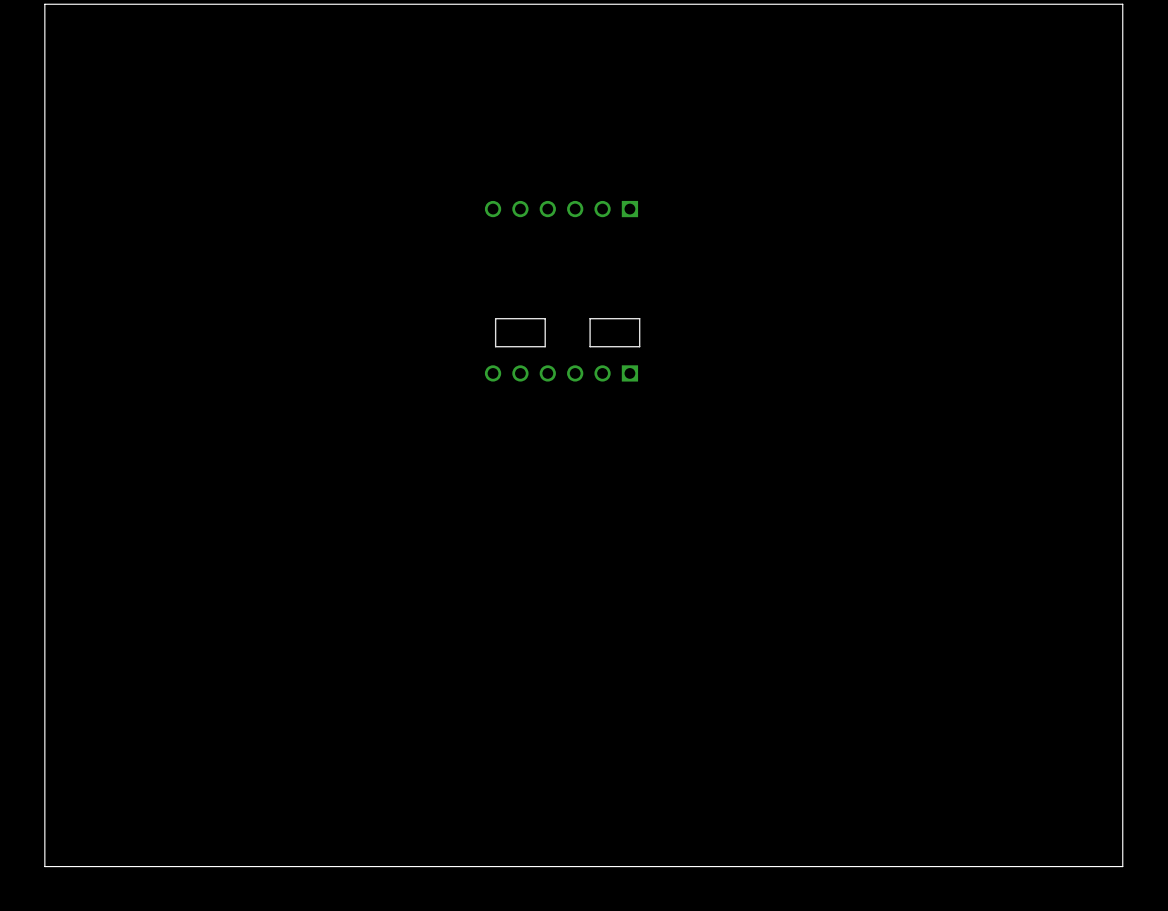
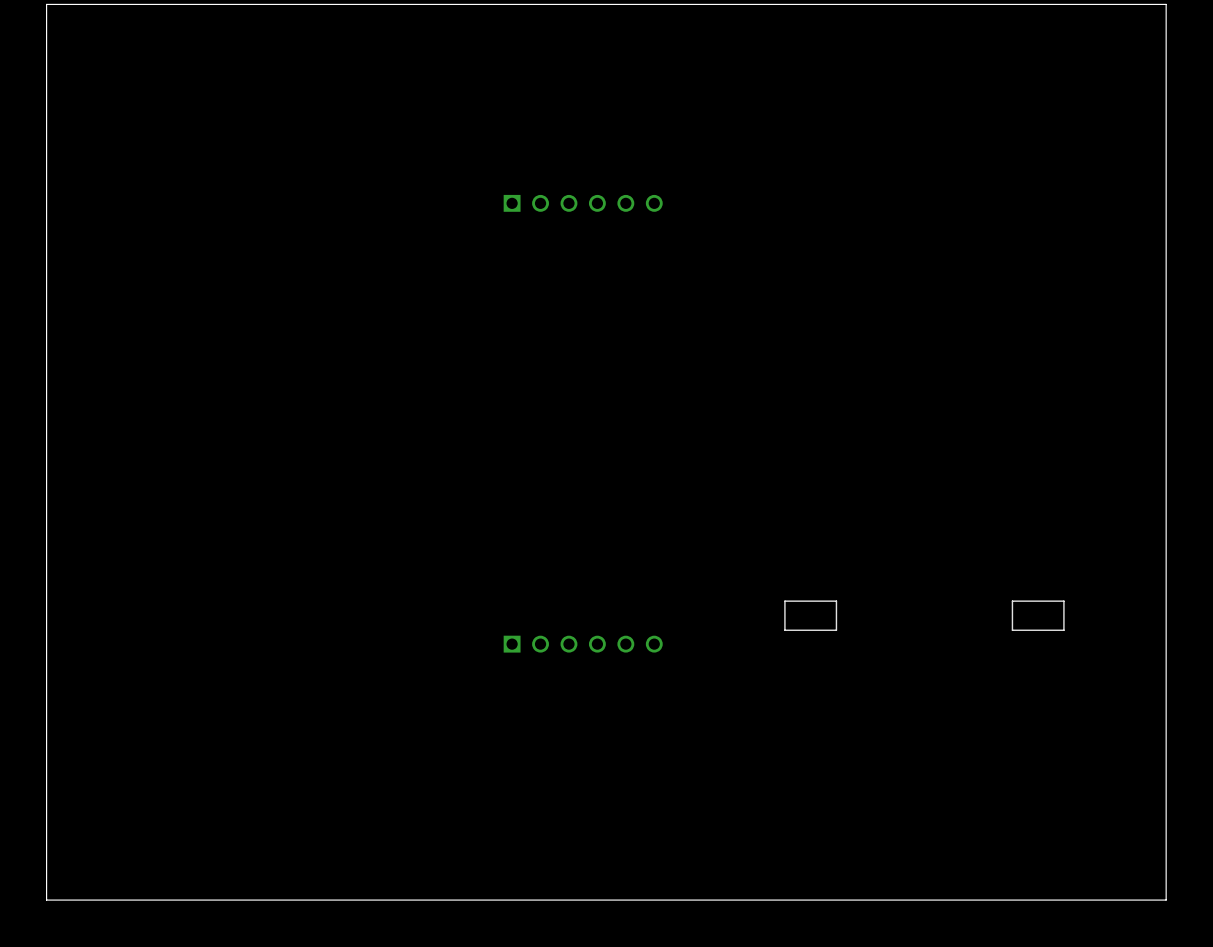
part rotation: 0° (561, 209) -> 180° (583, 203)
part: (520, 332) -> none
part: (614, 332) -> none
part: (561, 373) -> none
part: none -> (810, 615)
part: none -> (1038, 615)
part: none -> (583, 644)

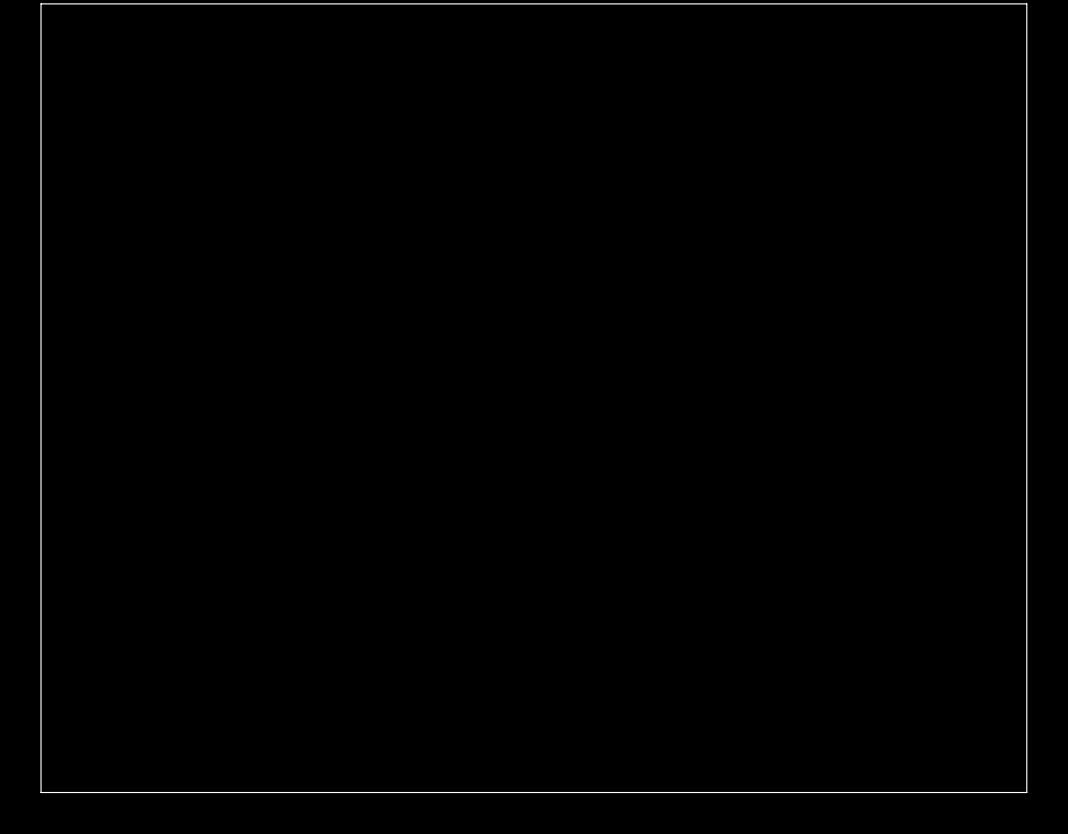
part: (583, 203) -> none
part: (810, 615) -> none
part: (1038, 615) -> none
part: (583, 644) -> none

